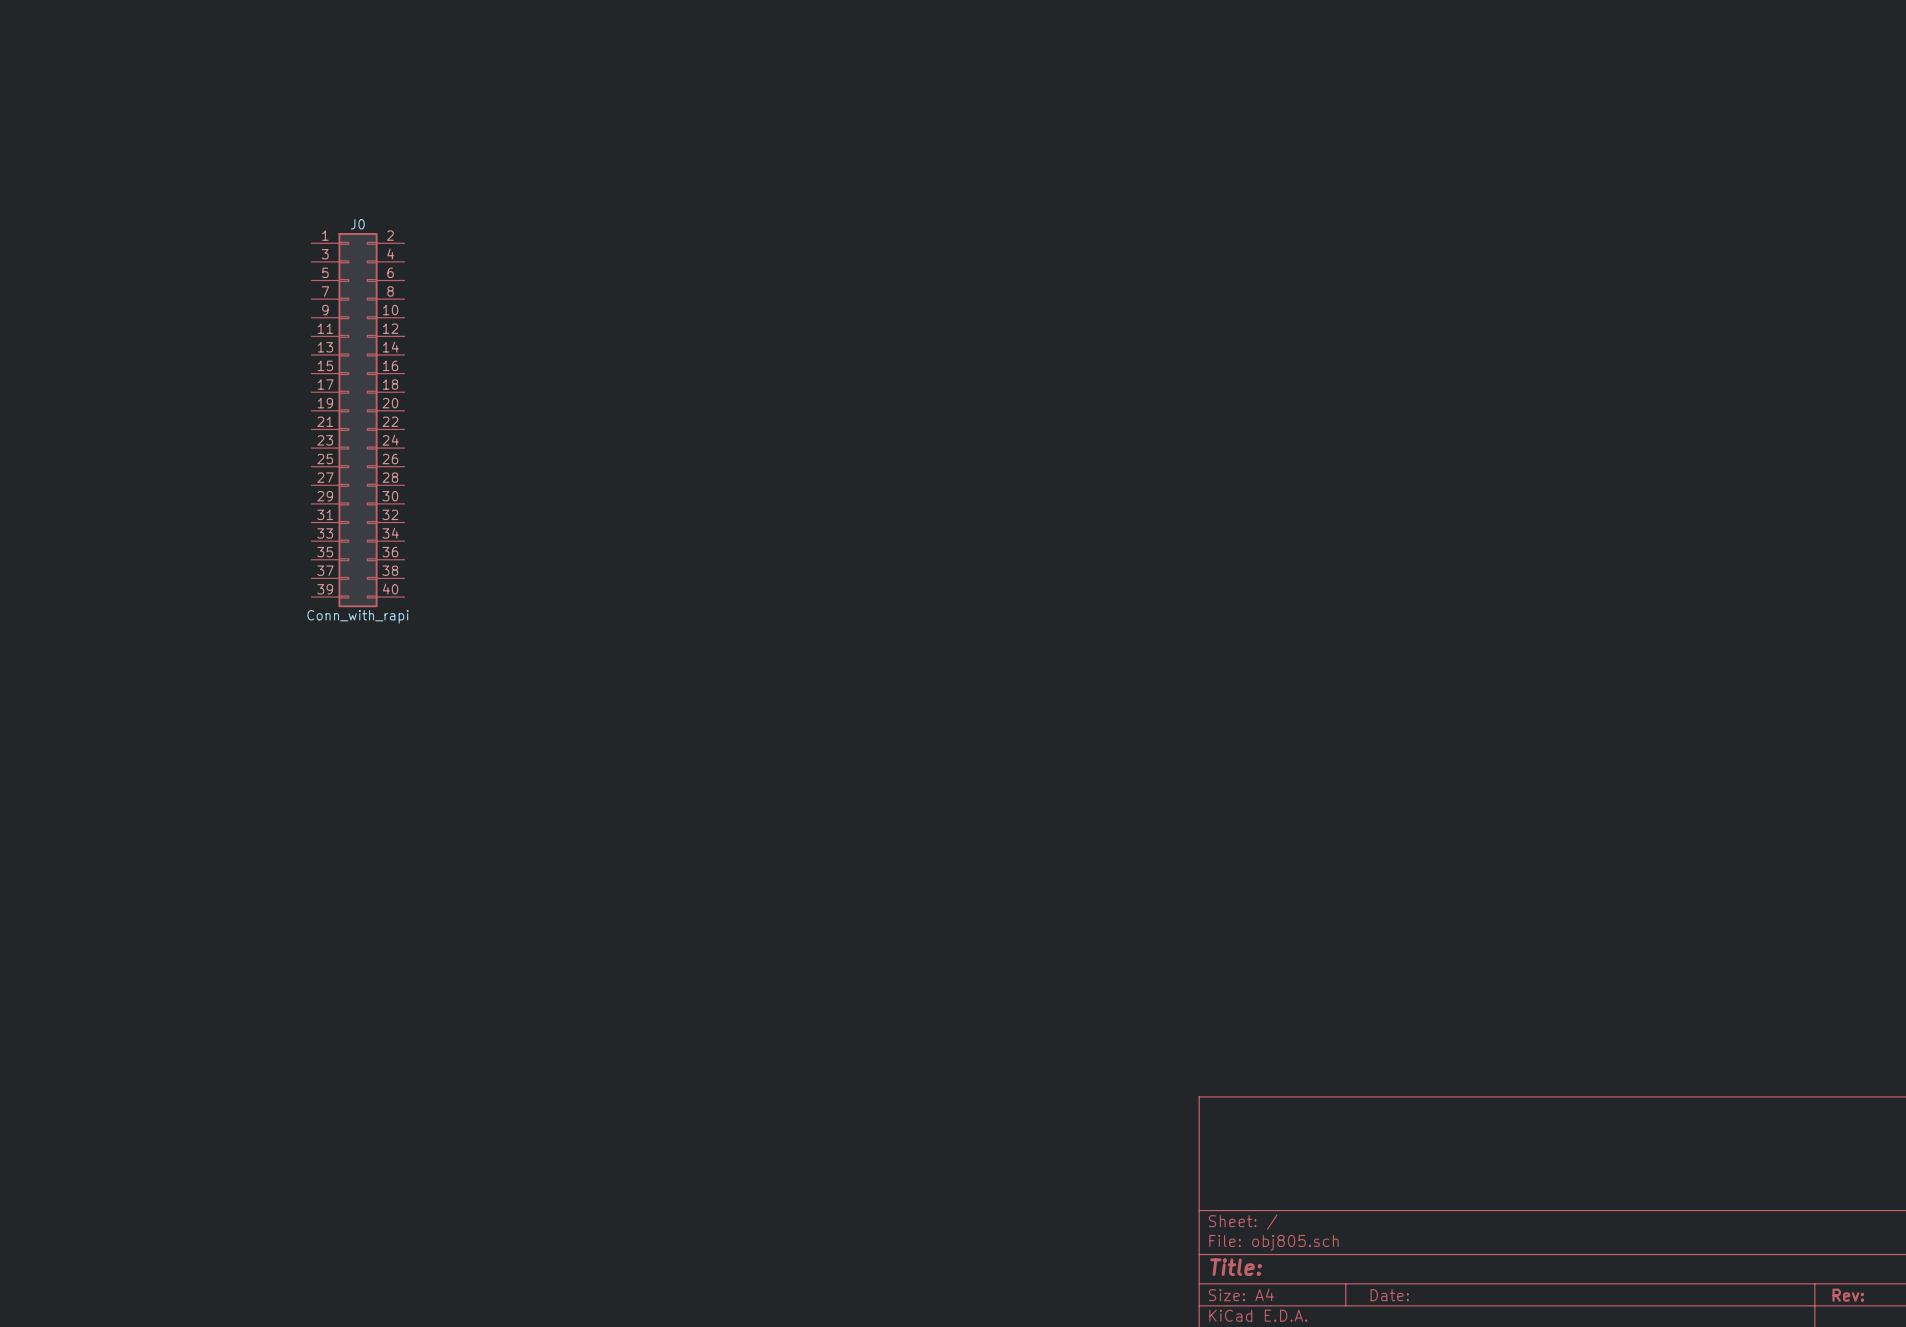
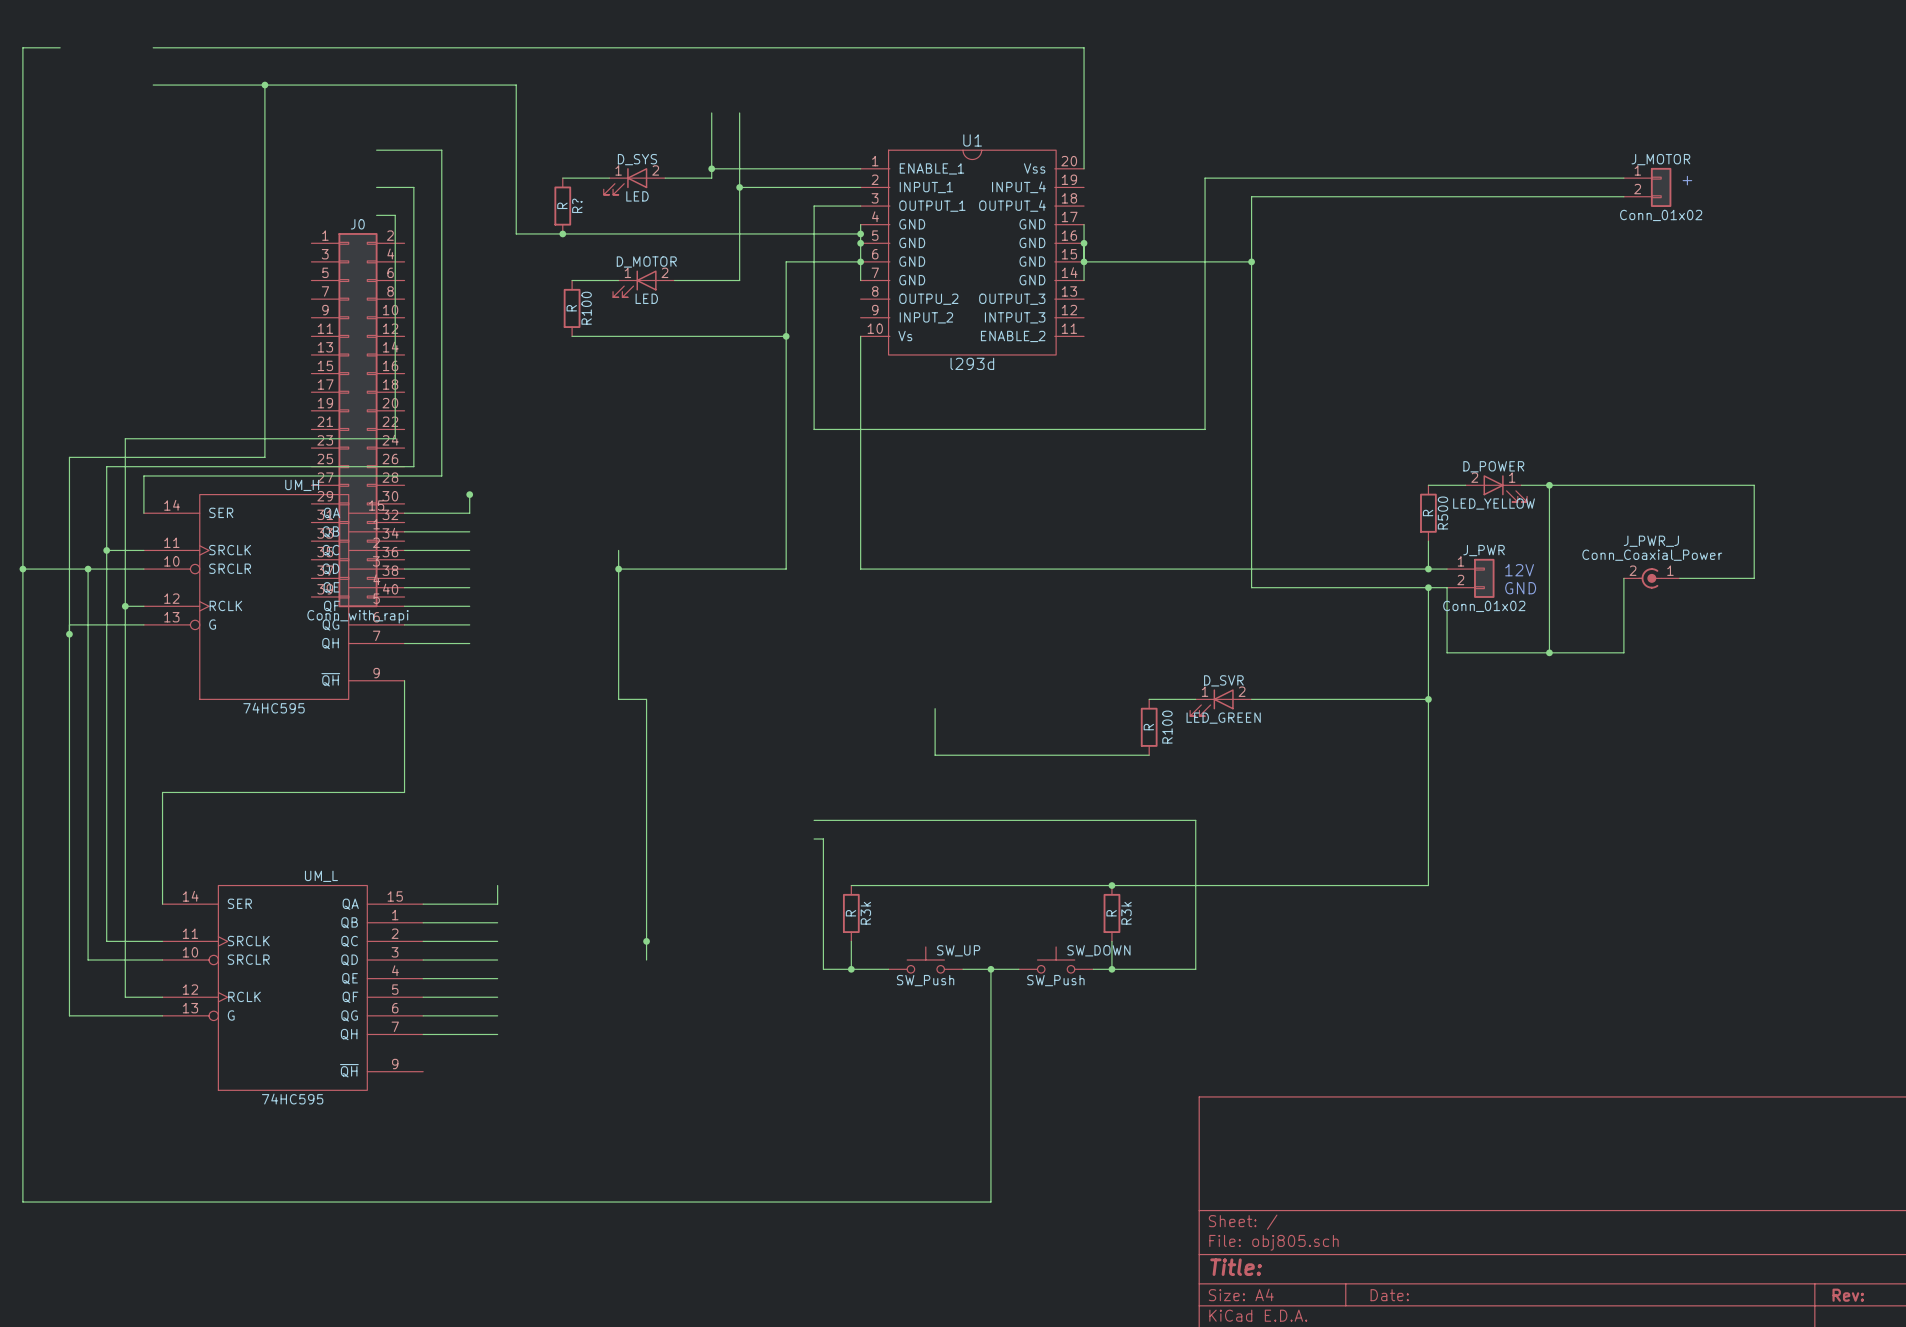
wire: none -> (60, 47) (22, 47) (22, 1202) (990, 1202) (990, 969)
wire: none -> (153, 47) (1084, 47) (1084, 168)
wire: none -> (153, 85) (516, 85) (516, 233) (860, 233)
wire: none -> (264, 85) (264, 457) (69, 457) (69, 1015) (162, 1015)
junction: none -> (264, 85)
wire: none -> (711, 112) (711, 178) (665, 178)
wire: none -> (739, 112) (739, 280) (674, 280)
wire: none -> (376, 150) (441, 150) (441, 475) (143, 475) (143, 513)
wire: none -> (711, 168) (860, 168)
junction: none -> (711, 168)
wire: none -> (562, 178) (609, 178)
wire: none -> (1623, 178) (1205, 178) (1205, 429) (814, 429) (814, 206) (860, 206)
text: none -> + (1687, 180)
D_SYS: none -> LED (634, 181)
wire: none -> (376, 187) (413, 187) (413, 466) (106, 466) (106, 941) (162, 941)
wire: none -> (739, 187) (860, 187)
junction: none -> (739, 187)
J_MOTOR: none -> Conn_01x02 (1647, 187)
wire: none -> (1623, 196) (1251, 196) (1251, 587) (1447, 587) (1447, 652) (1623, 652) (1623, 578)
R?: none -> R (562, 206)
wire: none -> (376, 215) (395, 215) (395, 438) (125, 438) (125, 997) (162, 997)
wire: none -> (860, 224) (860, 280)
wire: none -> (1084, 224) (1084, 280)
junction: none -> (562, 233)
junction: none -> (860, 233)
junction: none -> (860, 243)
junction: none -> (1084, 243)
U1: none -> l293d (972, 252)
wire: none -> (860, 261) (786, 261) (786, 569) (618, 569)
junction: none -> (860, 261)
wire: none -> (1084, 261) (1251, 261)
junction: none -> (1084, 261)
junction: none -> (1251, 261)
wire: none -> (572, 280) (618, 280)
D_MOTOR: none -> LED (643, 283)
R100: none -> R (572, 308)
wire: none -> (572, 336) (786, 336)
junction: none -> (786, 336)
wire: none -> (860, 336) (860, 569) (1447, 569)
wire: none -> (1428, 485) (1465, 485)
wire: none -> (1521, 485) (1754, 485) (1754, 578) (1679, 578)
wire: none -> (1549, 485) (1549, 652)
junction: none -> (1549, 485)
D_POWER: none -> LED_YELLOW (1496, 488)
wire: none -> (469, 494) (469, 513) (404, 513)
junction: none -> (469, 494)
R500: none -> R (1428, 513)
wire: none -> (404, 531) (469, 531)
wire: none -> (1428, 541) (1428, 569)
wire: none -> (106, 550) (143, 550)
junction: none -> (106, 550)
wire: none -> (404, 550) (469, 550)
wire: none -> (618, 550) (618, 699) (646, 699) (646, 960)
wire: none -> (22, 569) (143, 569)
junction: none -> (22, 569)
wire: none -> (88, 569) (88, 960) (162, 960)
junction: none -> (88, 569)
wire: none -> (404, 569) (469, 569)
junction: none -> (618, 569)
junction: none -> (1428, 569)
text: none -> 12V (1519, 570)
J_PWR: none -> Conn_01x02 (1470, 578)
J_PWR_J: none -> Conn_Coaxial_Power (1651, 578)
wire: none -> (404, 587) (469, 587)
wire: none -> (1428, 587) (1428, 885) (851, 885)
junction: none -> (1428, 587)
text: none -> GND (1520, 588)
UM_H: none -> 74HC595 (274, 596)
wire: none -> (125, 606) (143, 606)
junction: none -> (125, 606)
wire: none -> (404, 606) (469, 606)
wire: none -> (69, 624) (143, 624)
wire: none -> (404, 624) (469, 624)
junction: none -> (69, 634)
wire: none -> (404, 643) (469, 643)
junction: none -> (1549, 652)
wire: none -> (404, 680) (404, 792) (162, 792) (162, 904)
wire: none -> (1149, 699) (1195, 699)
wire: none -> (1251, 699) (1428, 699)
junction: none -> (1428, 699)
D_SVR: none -> LED_GREEN (1220, 702)
wire: none -> (935, 708) (935, 755) (1149, 755)
R100: none -> R (1149, 727)
wire: none -> (814, 820) (1195, 820) (1195, 969) (1093, 969)
wire: none -> (814, 839) (823, 839) (823, 969) (888, 969)
wire: none -> (497, 885) (497, 904) (423, 904)
junction: none -> (1111, 885)
R3k: none -> R (851, 913)
R3k: none -> R (1111, 913)
wire: none -> (423, 922) (497, 922)
wire: none -> (423, 941) (497, 941)
junction: none -> (646, 941)
wire: none -> (851, 941) (851, 969)
wire: none -> (1111, 941) (1111, 969)
wire: none -> (423, 960) (497, 960)
SW_UP: none -> SW_Push (925, 960)
SW_DOWN: none -> SW_Push (1056, 960)
junction: none -> (851, 969)
wire: none -> (963, 969) (1018, 969)
junction: none -> (990, 969)
junction: none -> (1111, 969)
wire: none -> (423, 978) (497, 978)
UM_L: none -> 74HC595 (292, 987)
wire: none -> (423, 997) (497, 997)
wire: none -> (423, 1015) (497, 1015)
wire: none -> (423, 1034) (497, 1034)

